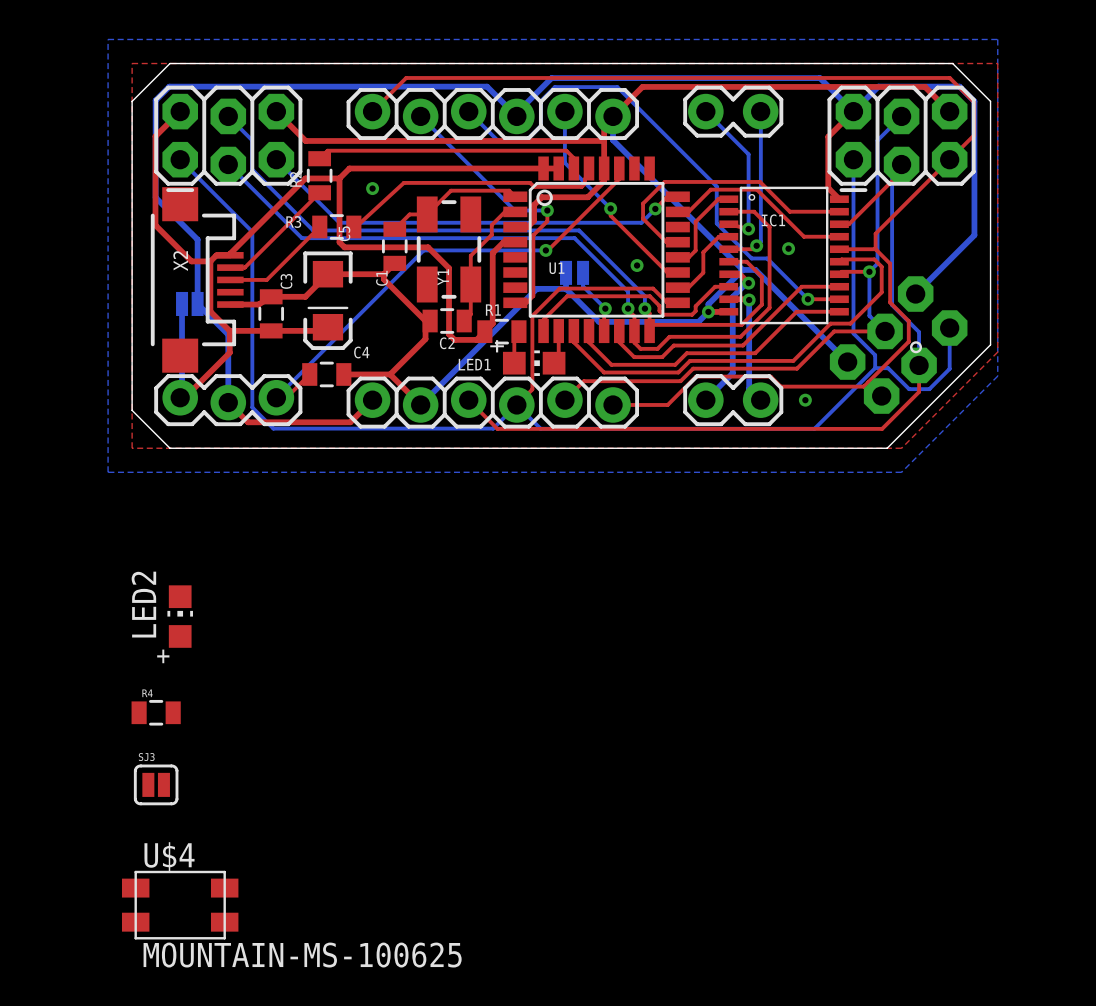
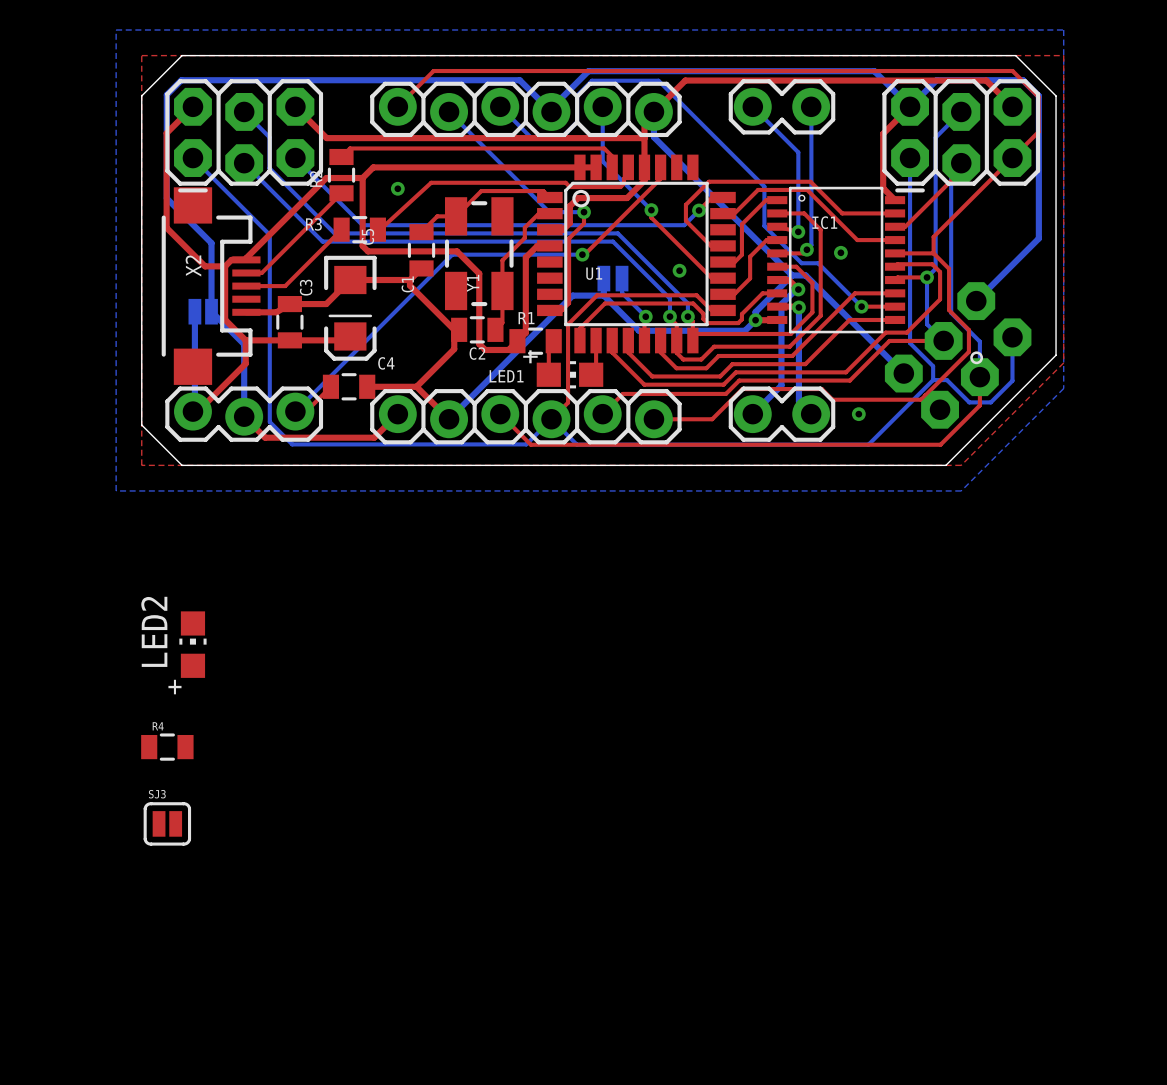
U$4: MOUNTAIN-MS-100625 (180, 905) -> none

